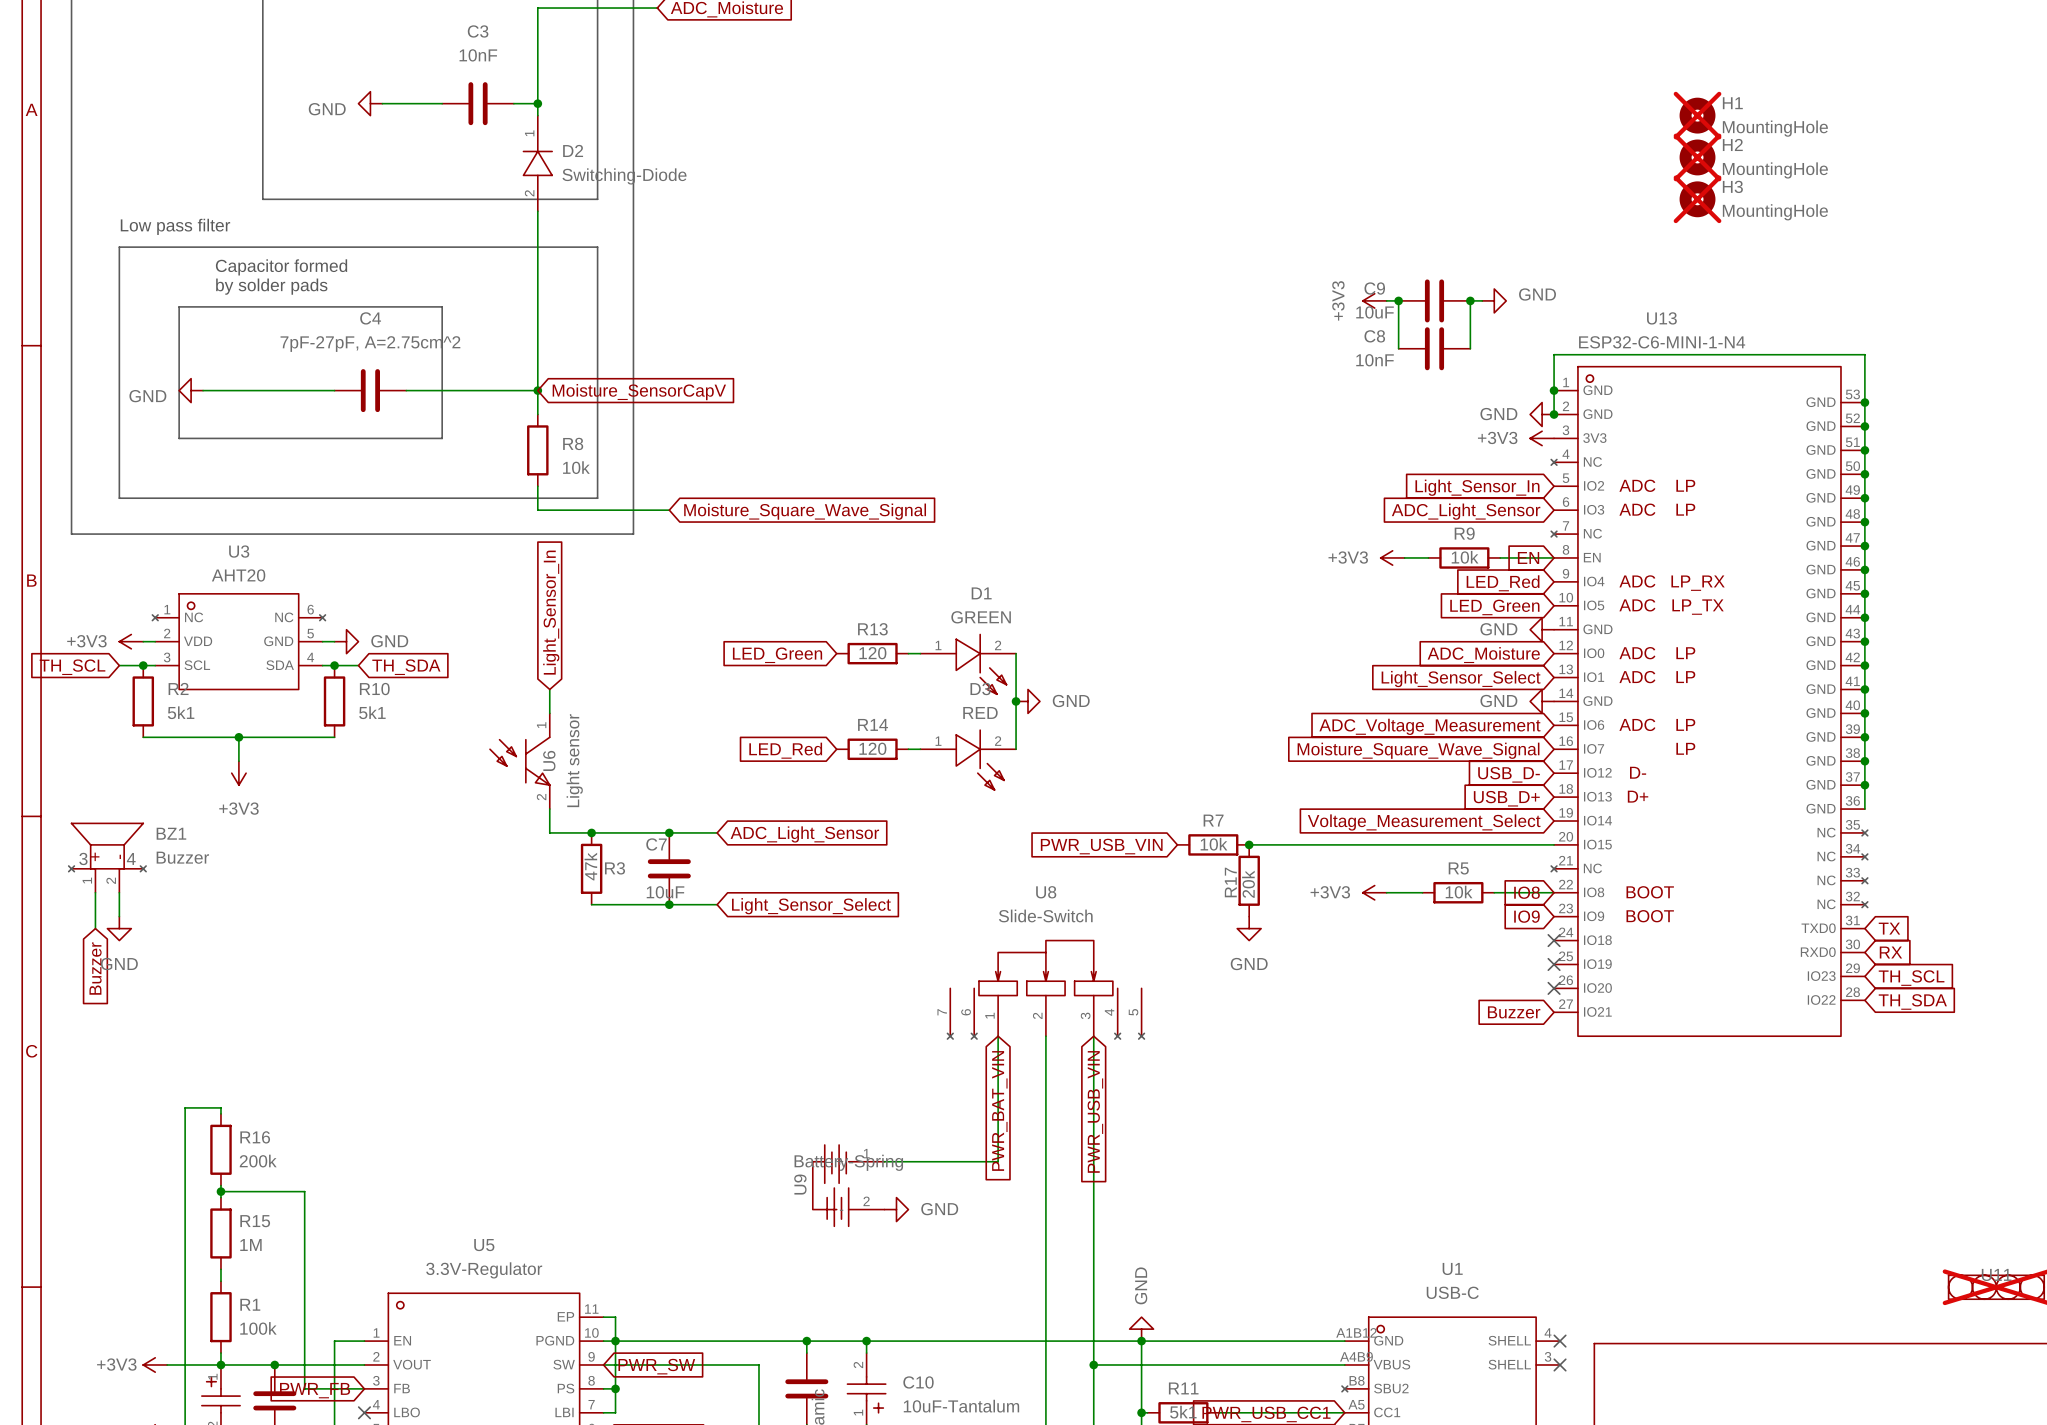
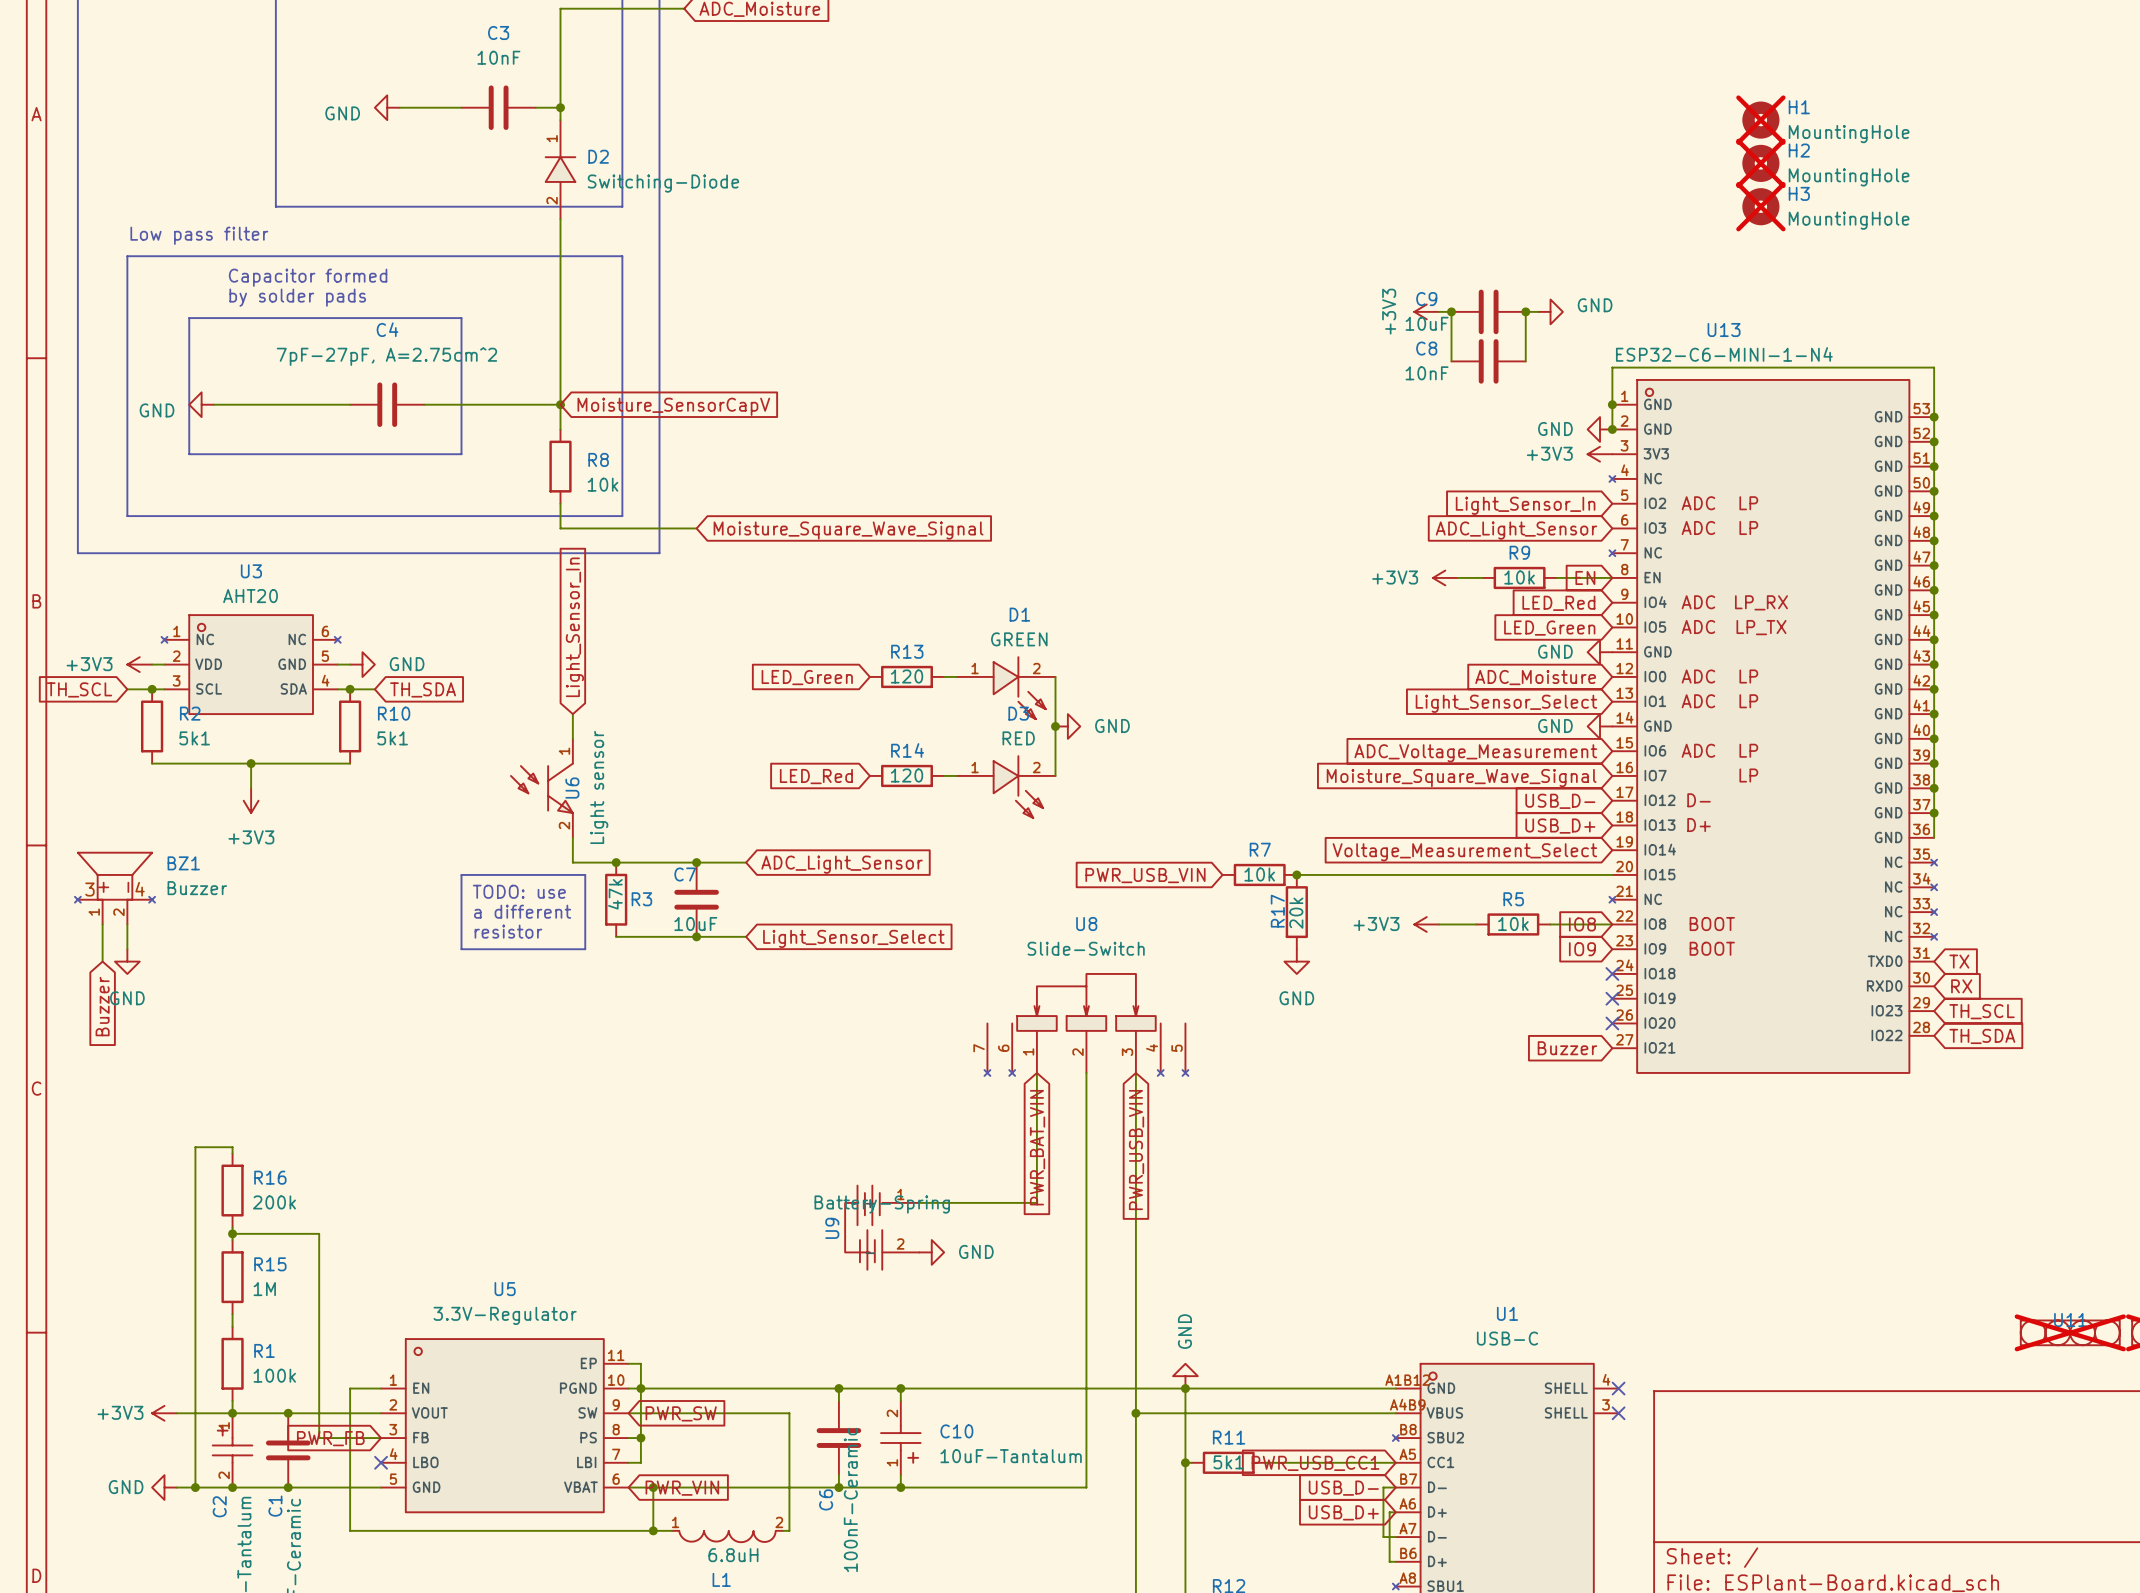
line: none -> (461, 874) (585, 874) (585, 949) (461, 949) (461, 874)
text: none -> TODO: use (519, 891)
text: none -> a different (522, 911)
text: none -> resistor (508, 931)

